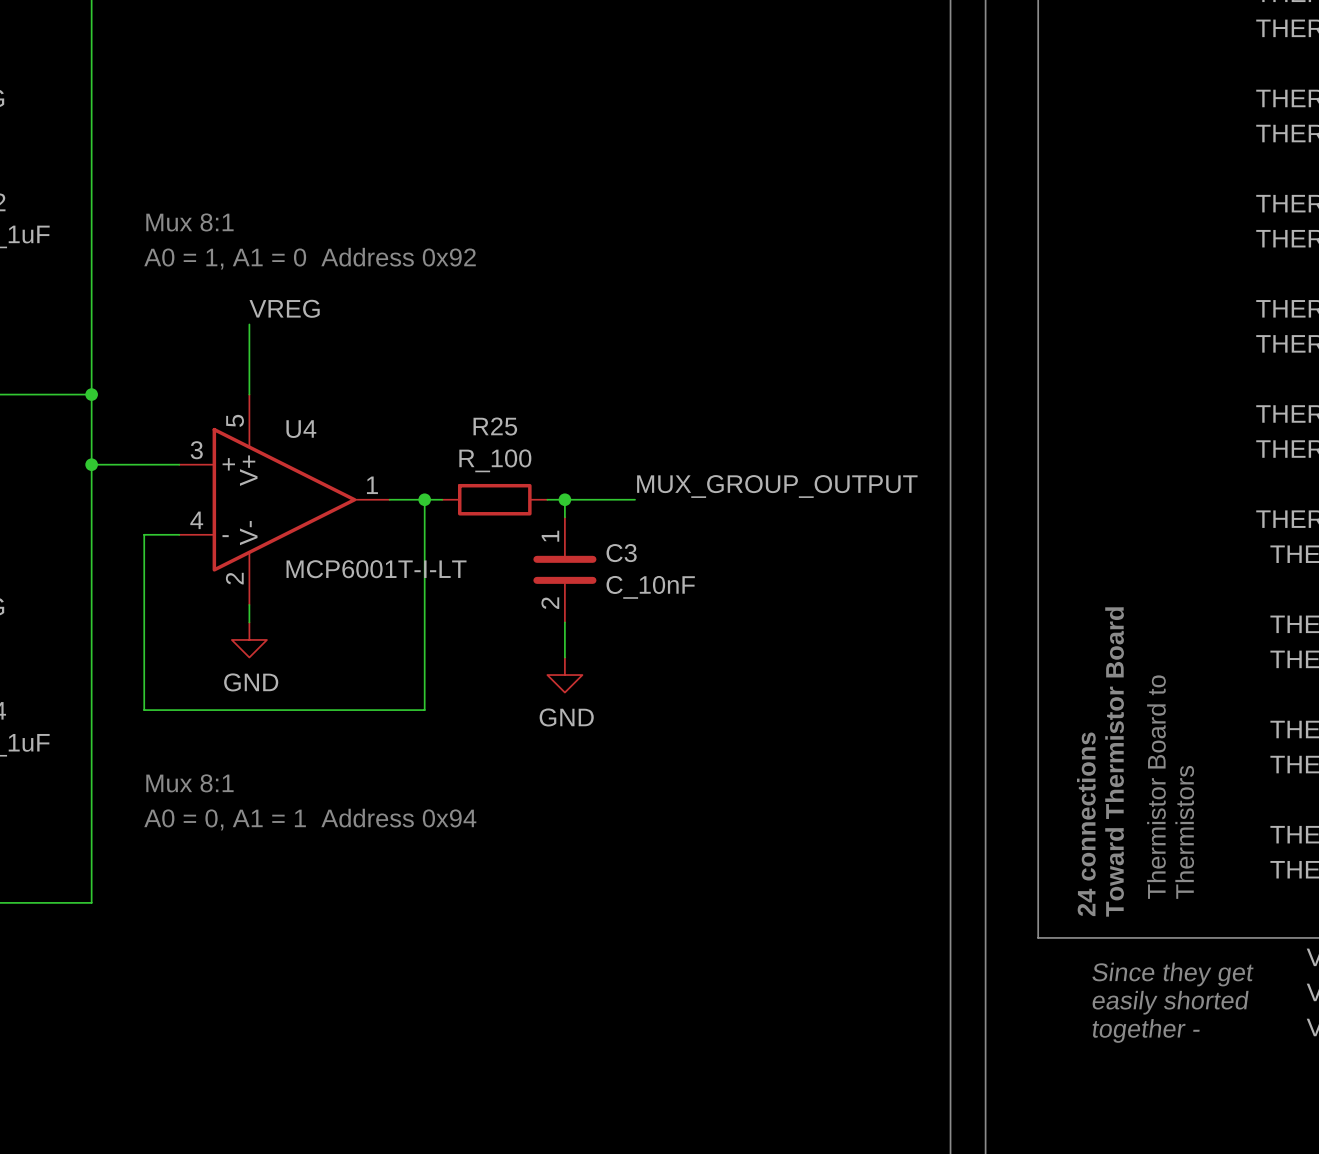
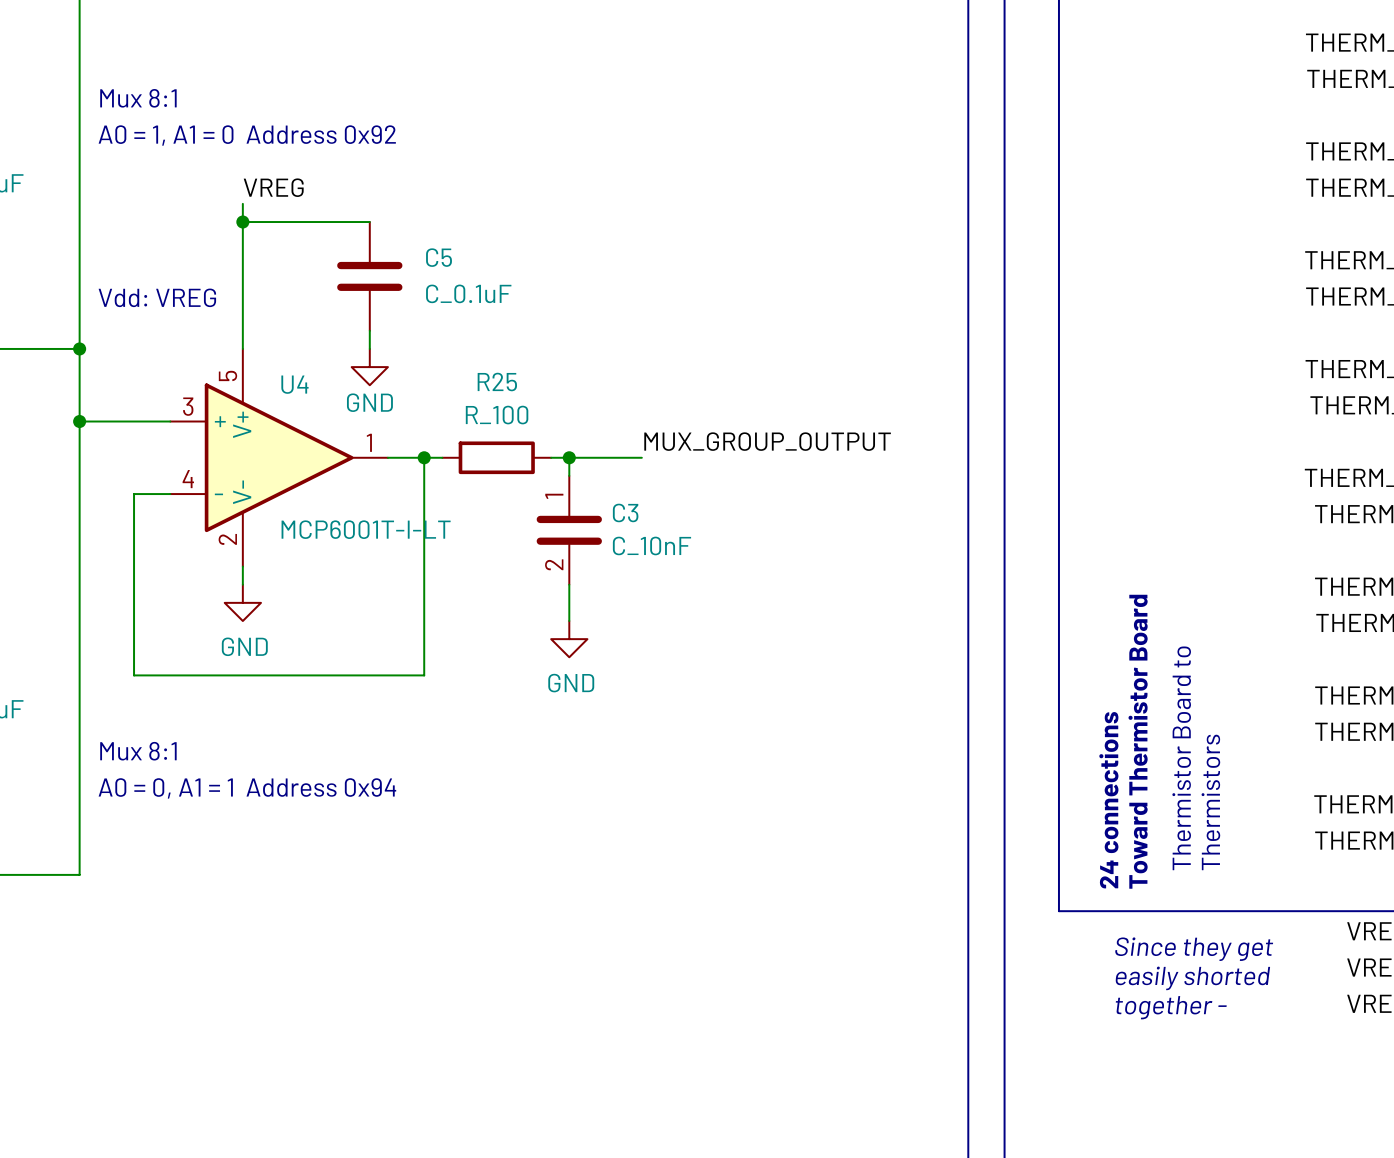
text position: Mux 8:1 (189, 222) -> Mux 8:1 (138, 98)
wire: none -> (242, 203) (242, 276)
text position: A0 = 1, A1 = 0 Address 0x92 (310, 258) -> A0 = 1, A1 = 0 Address 0x92 (247, 135)
wire: none -> (242, 222) (369, 222)
junction: none -> (242, 222)
label position: VREG (284, 308) -> VREG (273, 187)
C5: none -> C_0.1uF (369, 276)
text: none -> Vdd: VREG (157, 297)
wire: none -> (369, 330) (369, 348)
power symbol: none -> GND (369, 367)
text position: Mux 8:1 (189, 783) -> Mux 8:1 (138, 751)
text position: A0 = 0, A1 = 1 Address 0x94 (310, 819) -> A0 = 0, A1 = 1 Address 0x94 (247, 788)

